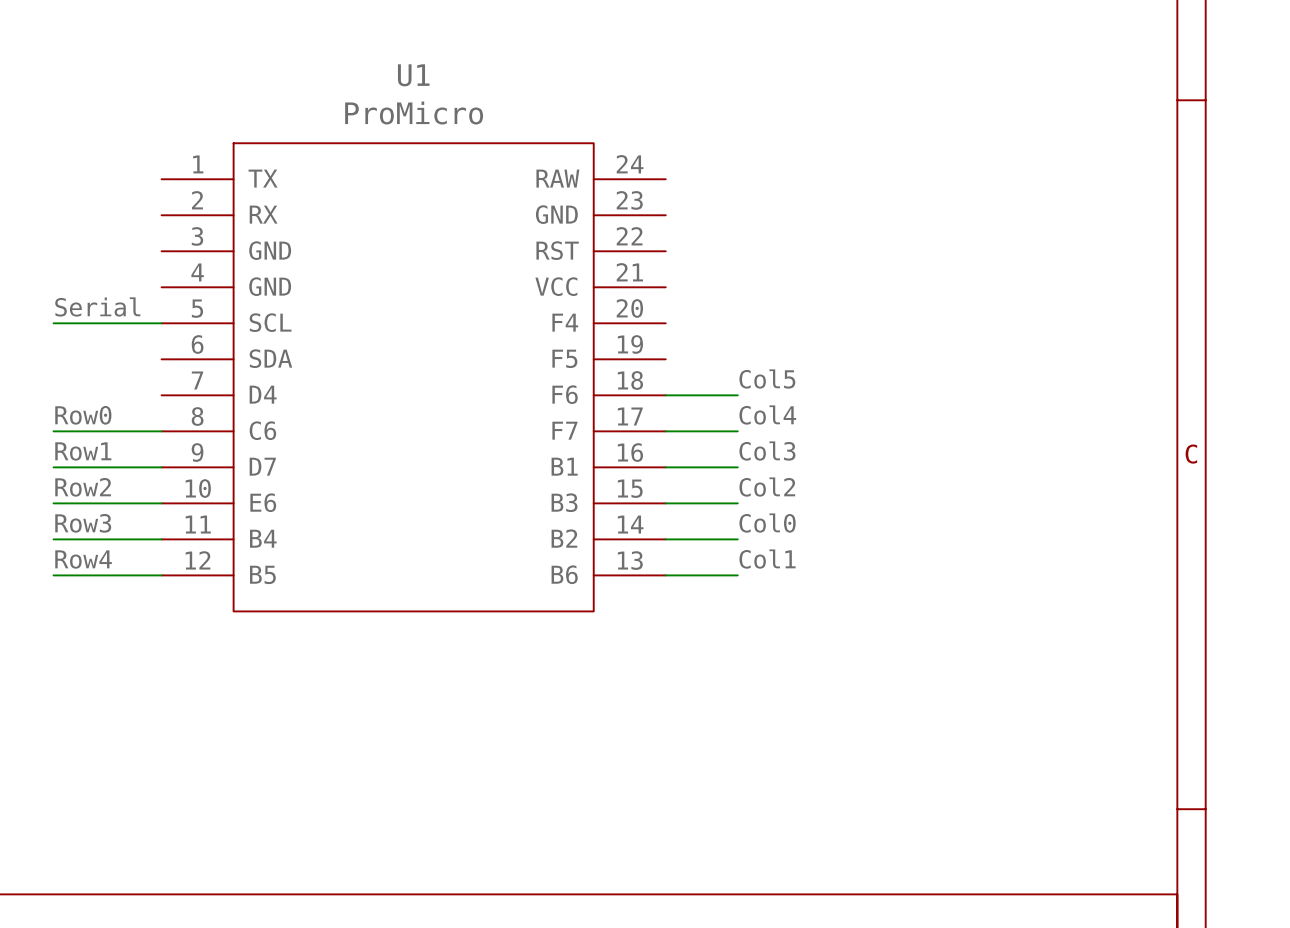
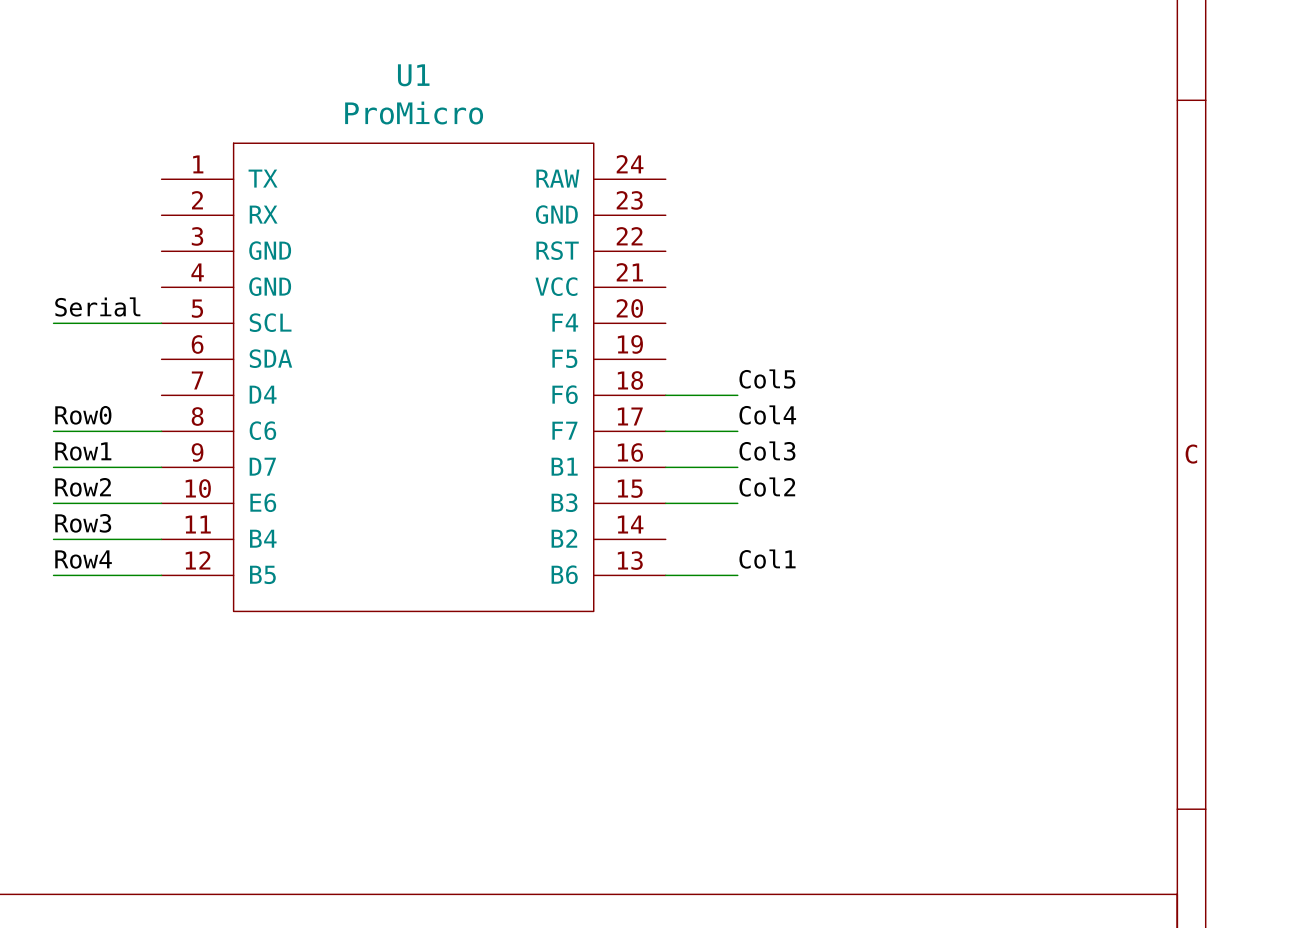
label: Col0 (767, 523) -> none
wire: (665, 539) (737, 539) -> none

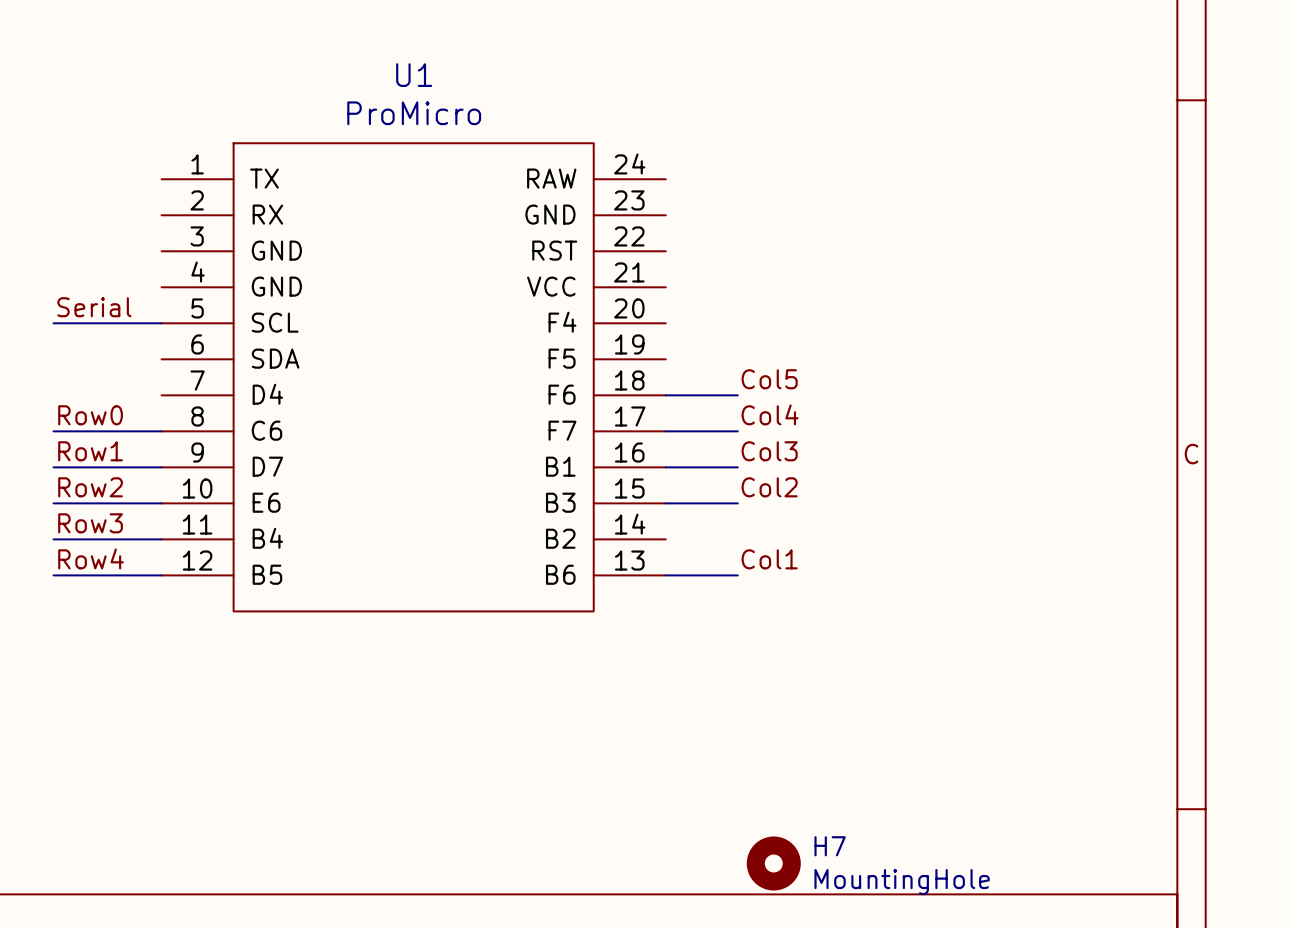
H7: none -> MountingHole (773, 863)

